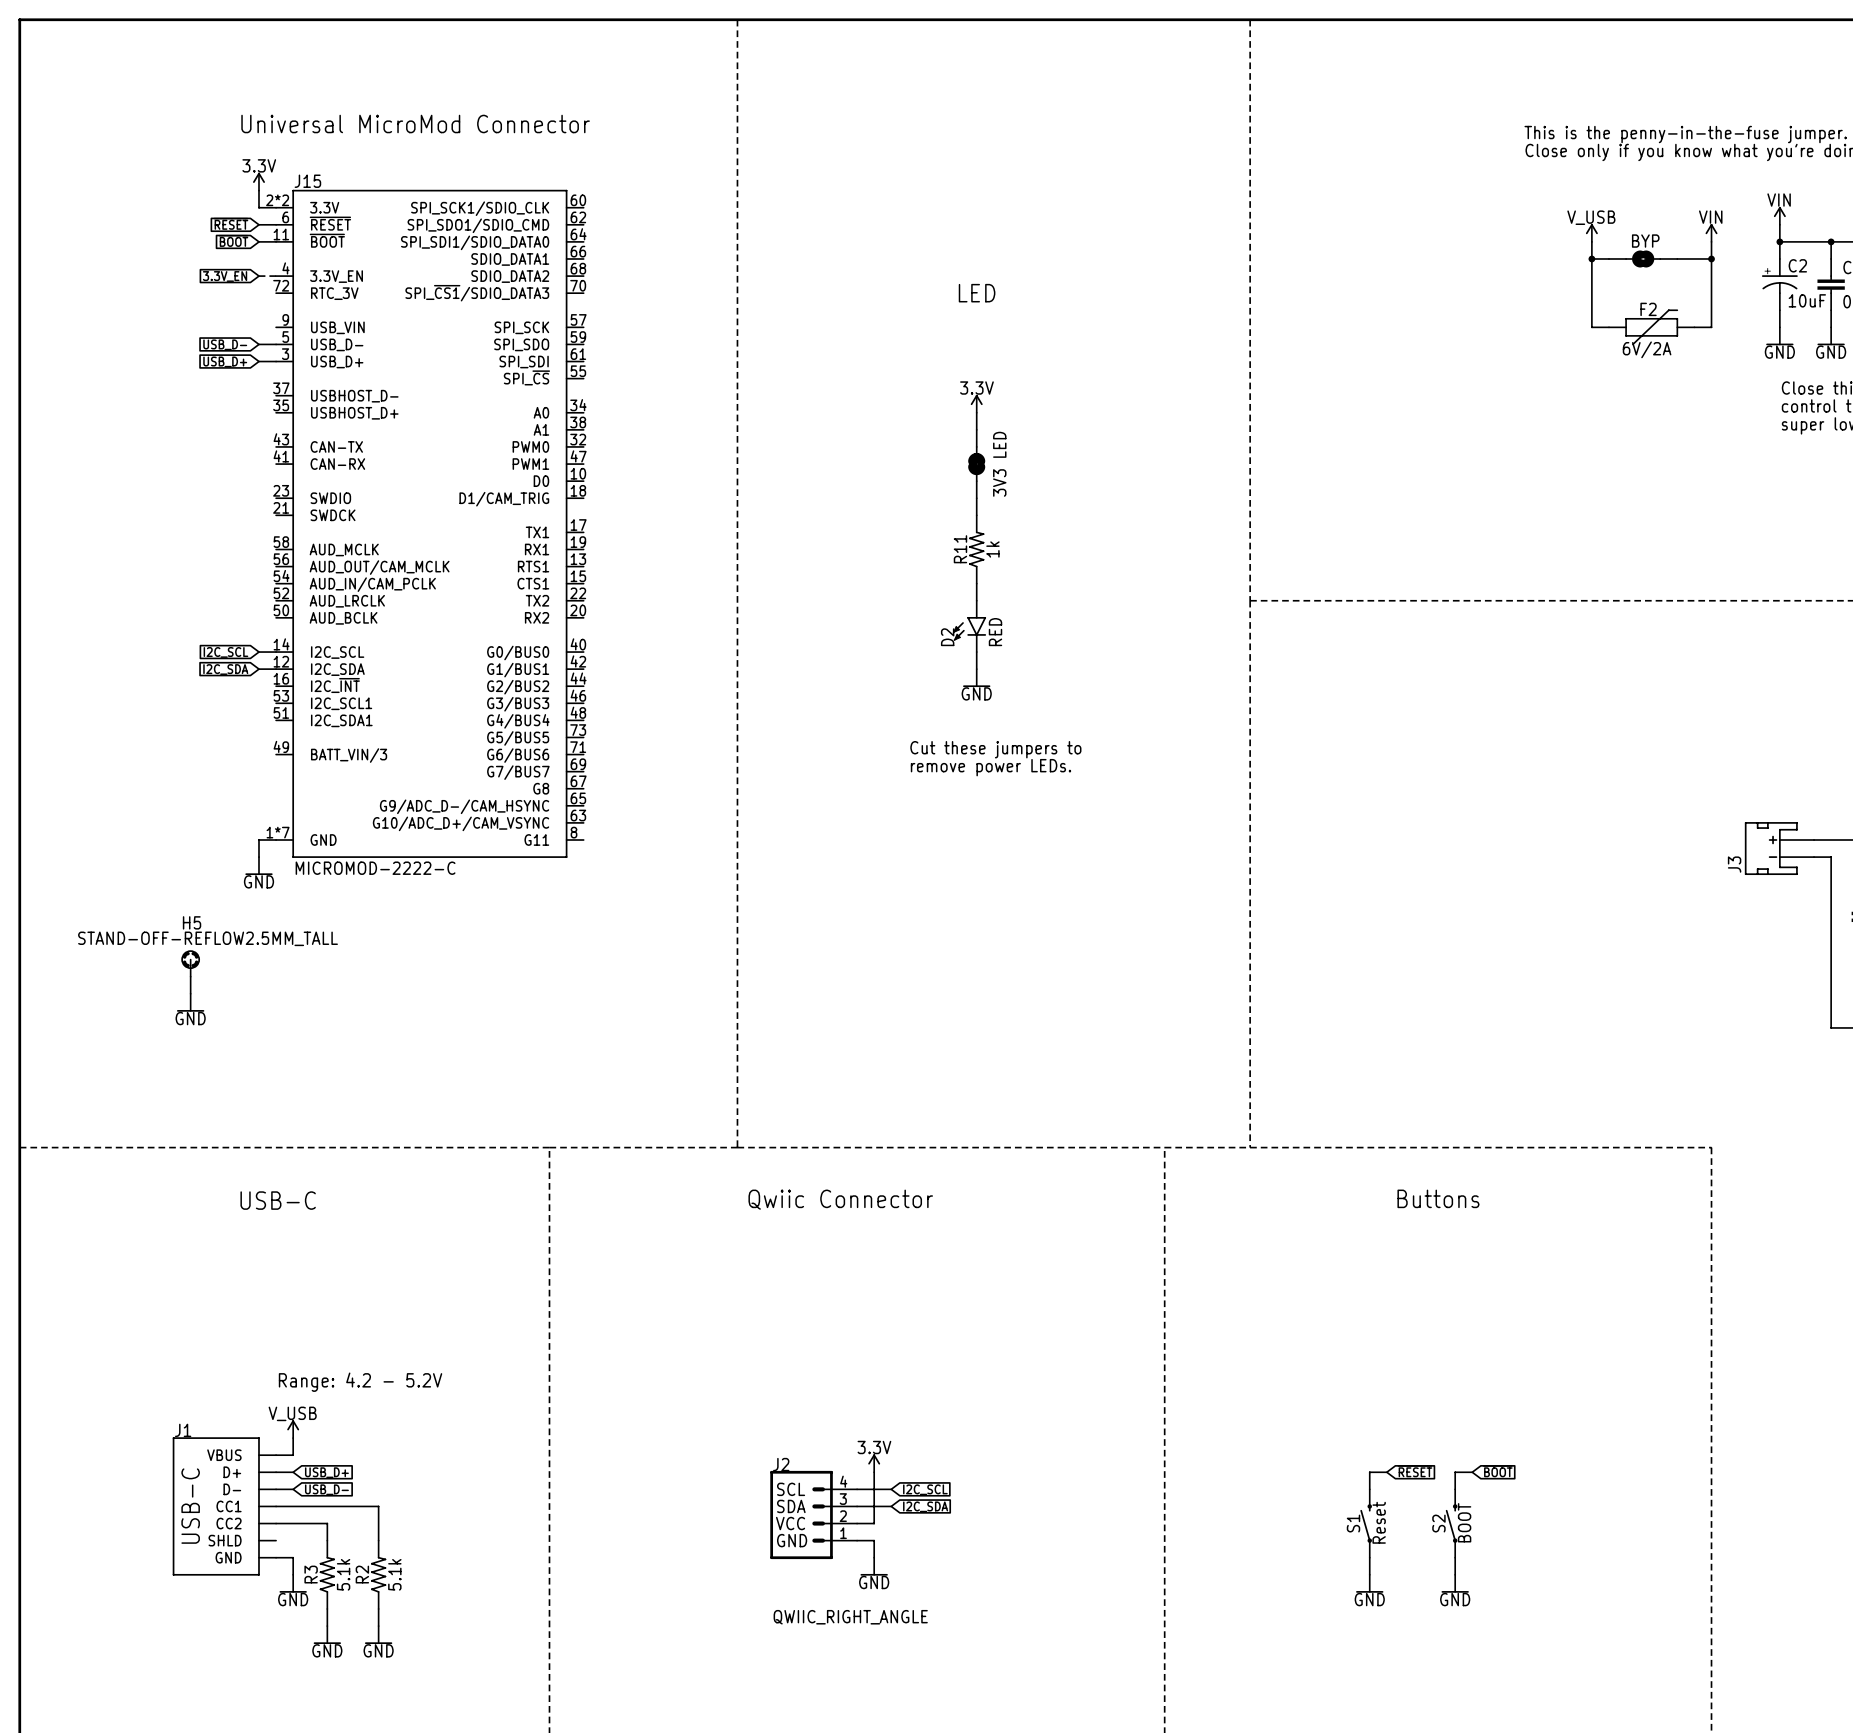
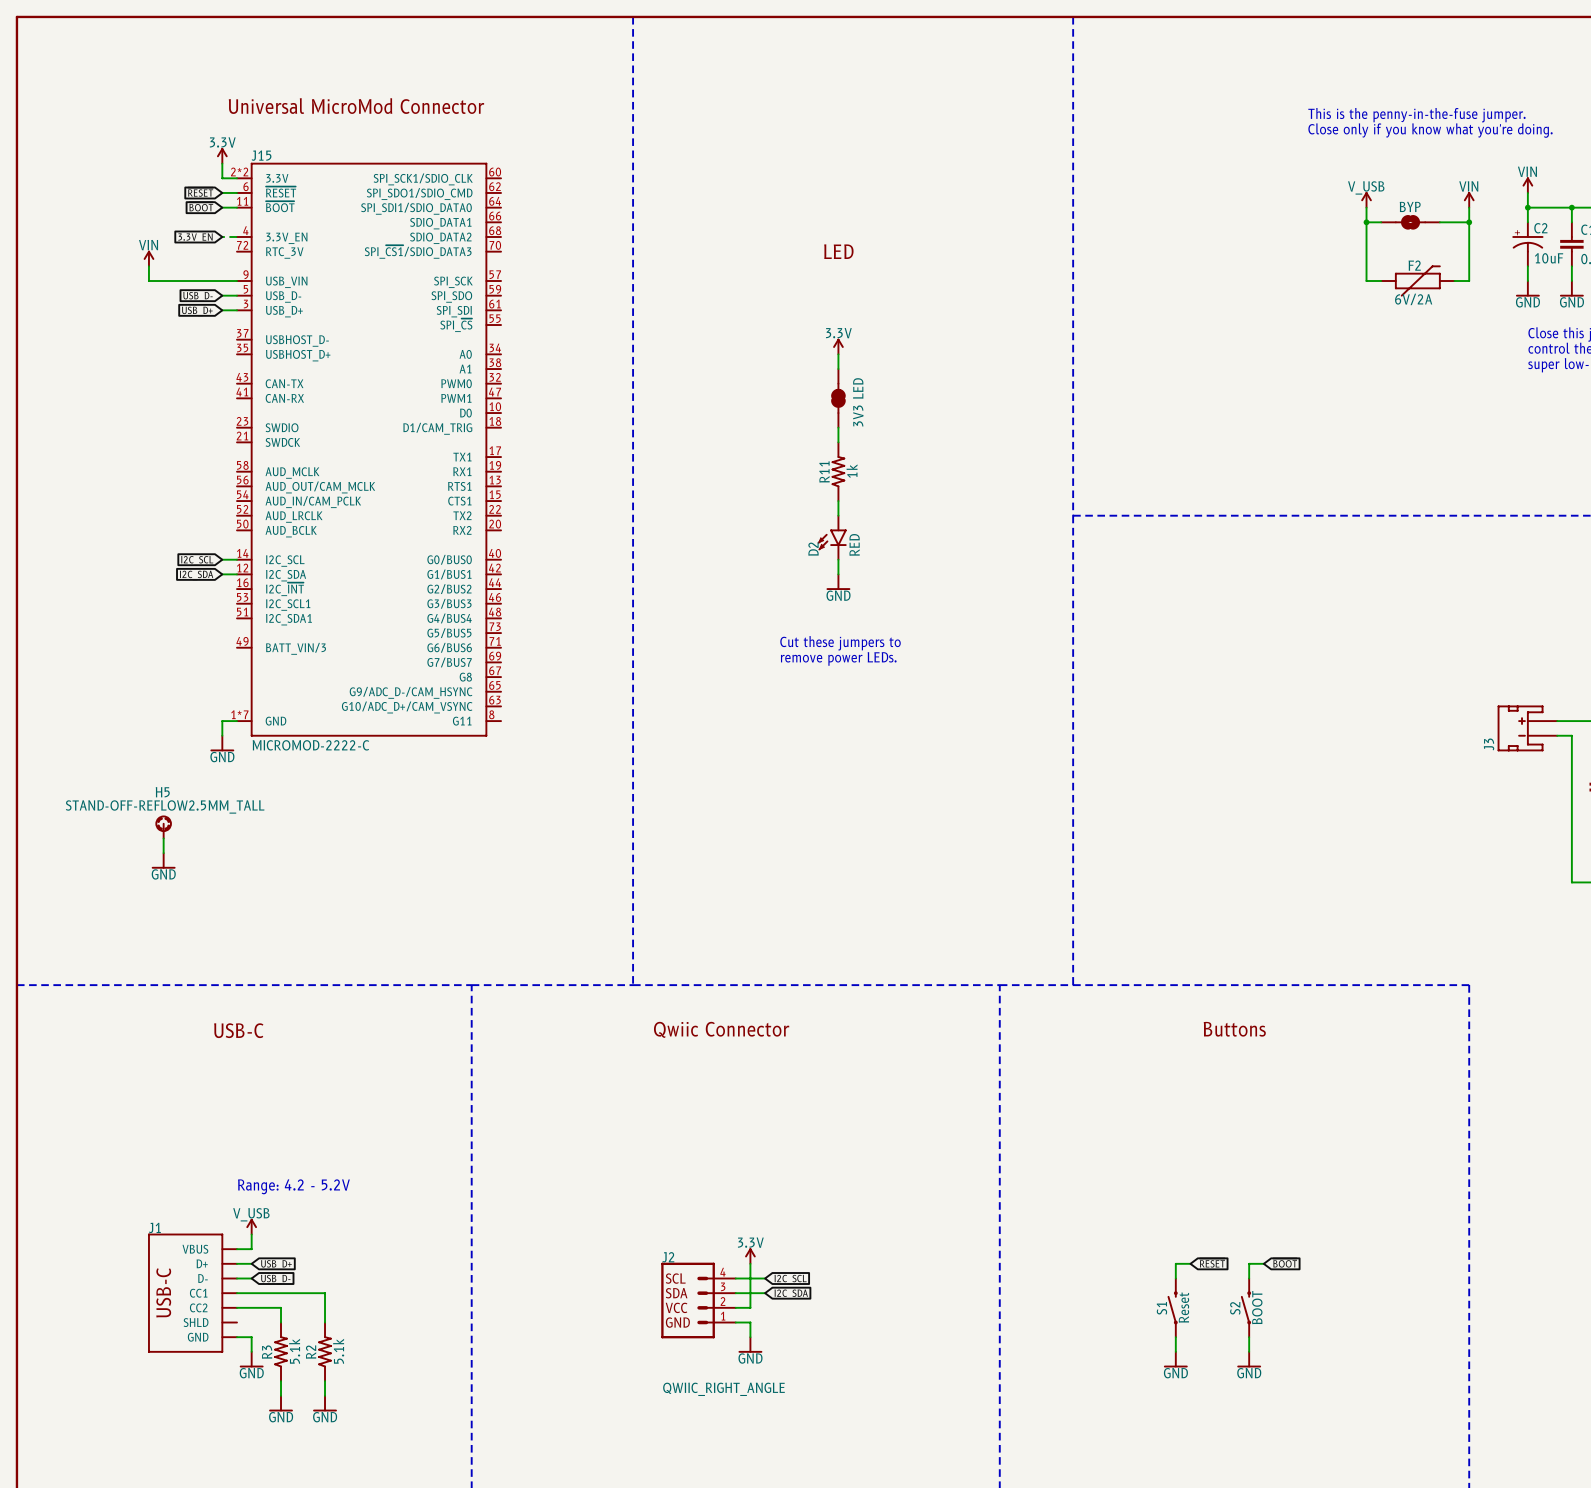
power symbol: none -> VIN (148, 258)
wire: none -> (148, 266) (148, 281) (236, 281)

